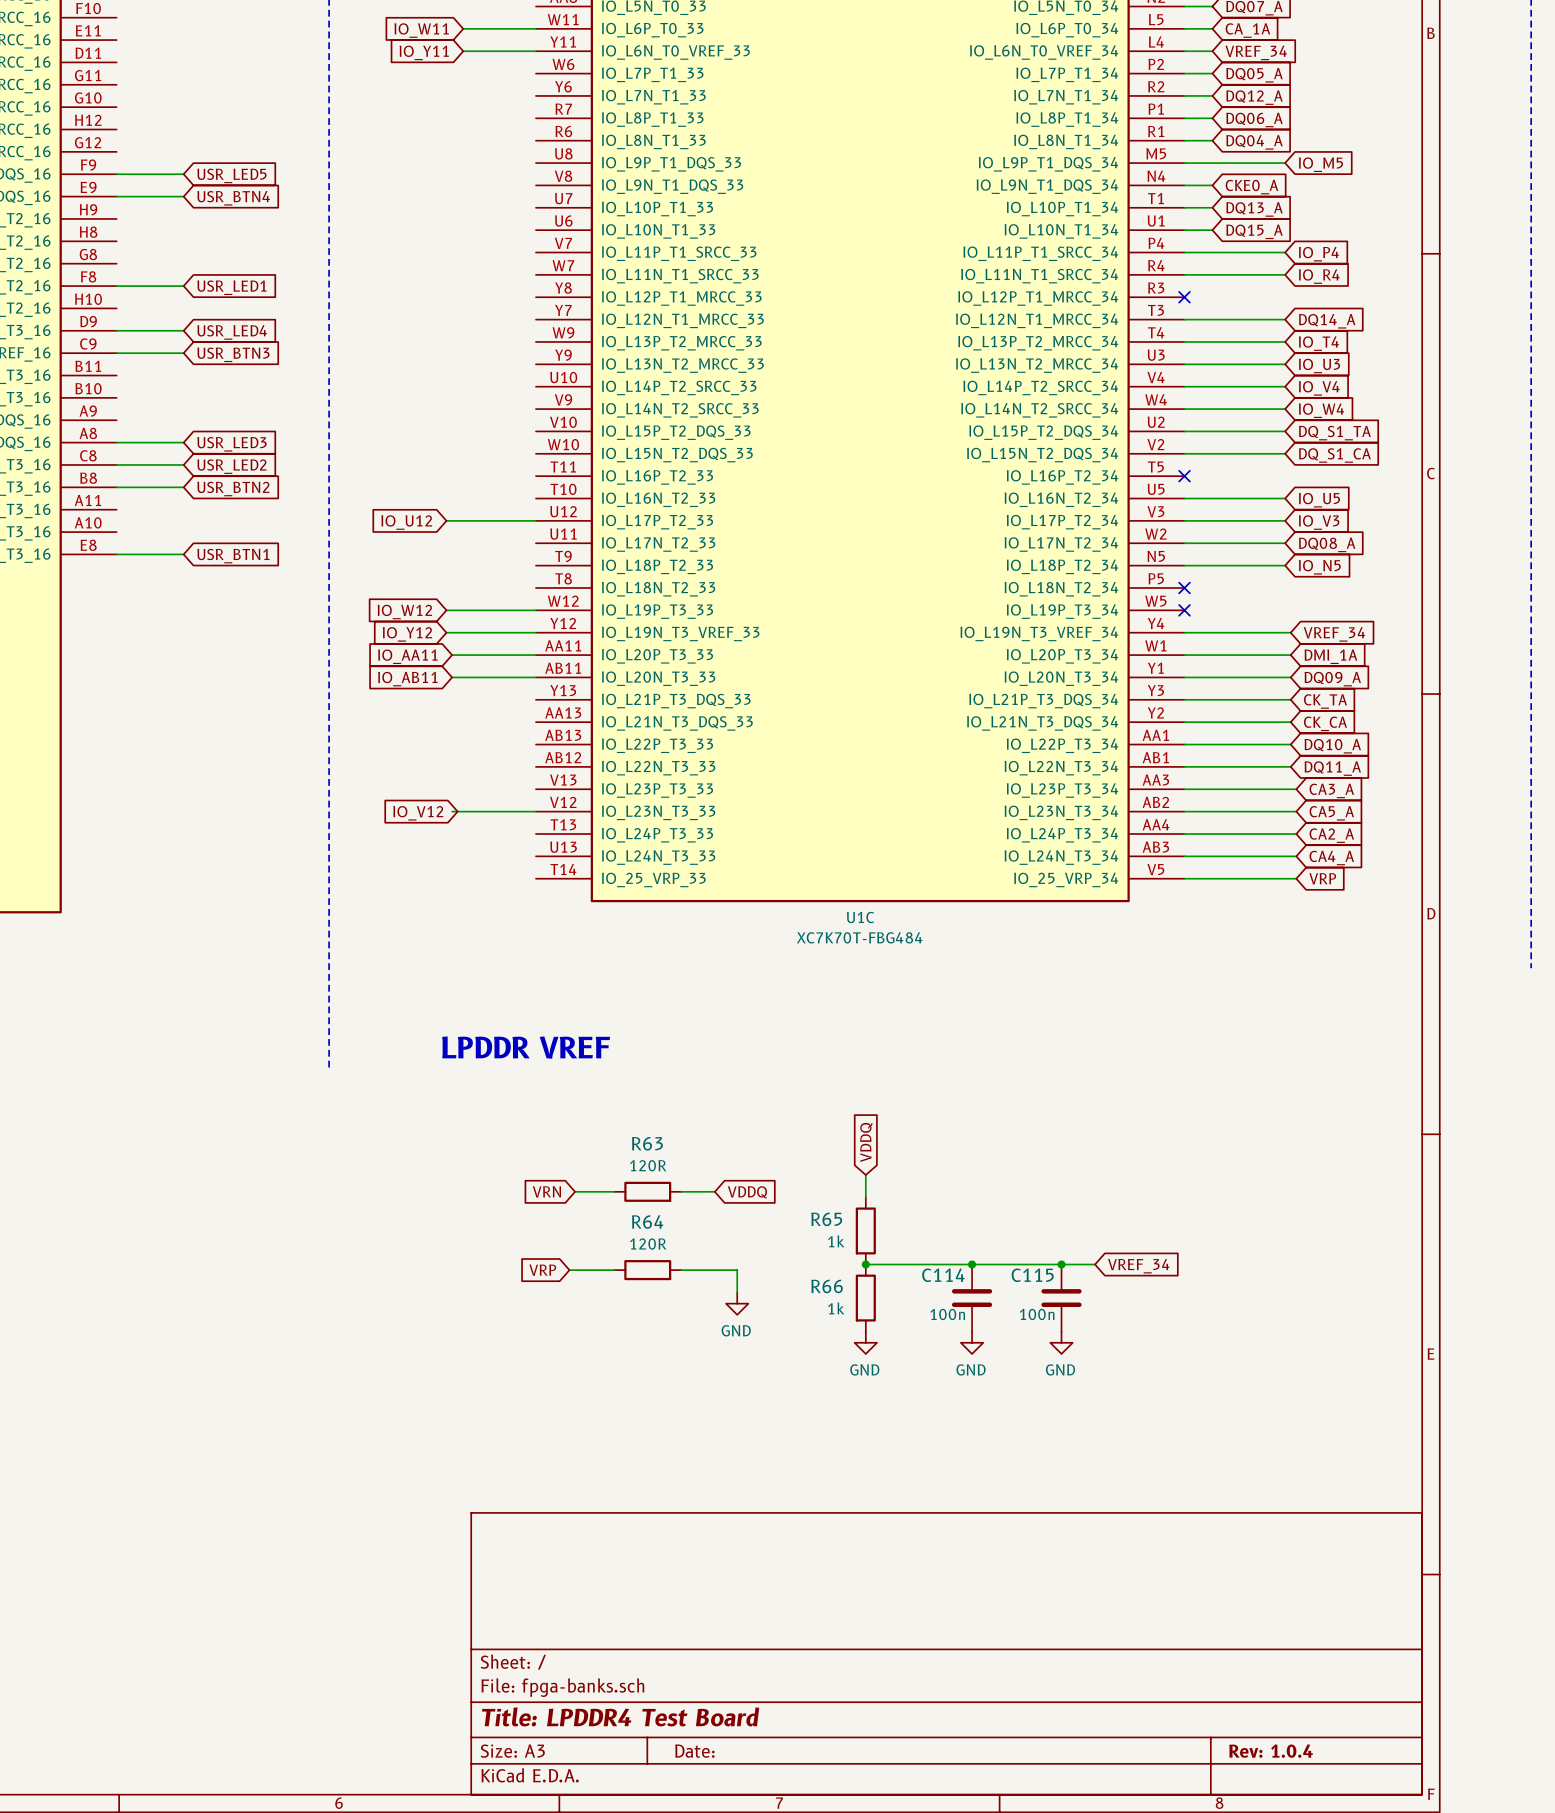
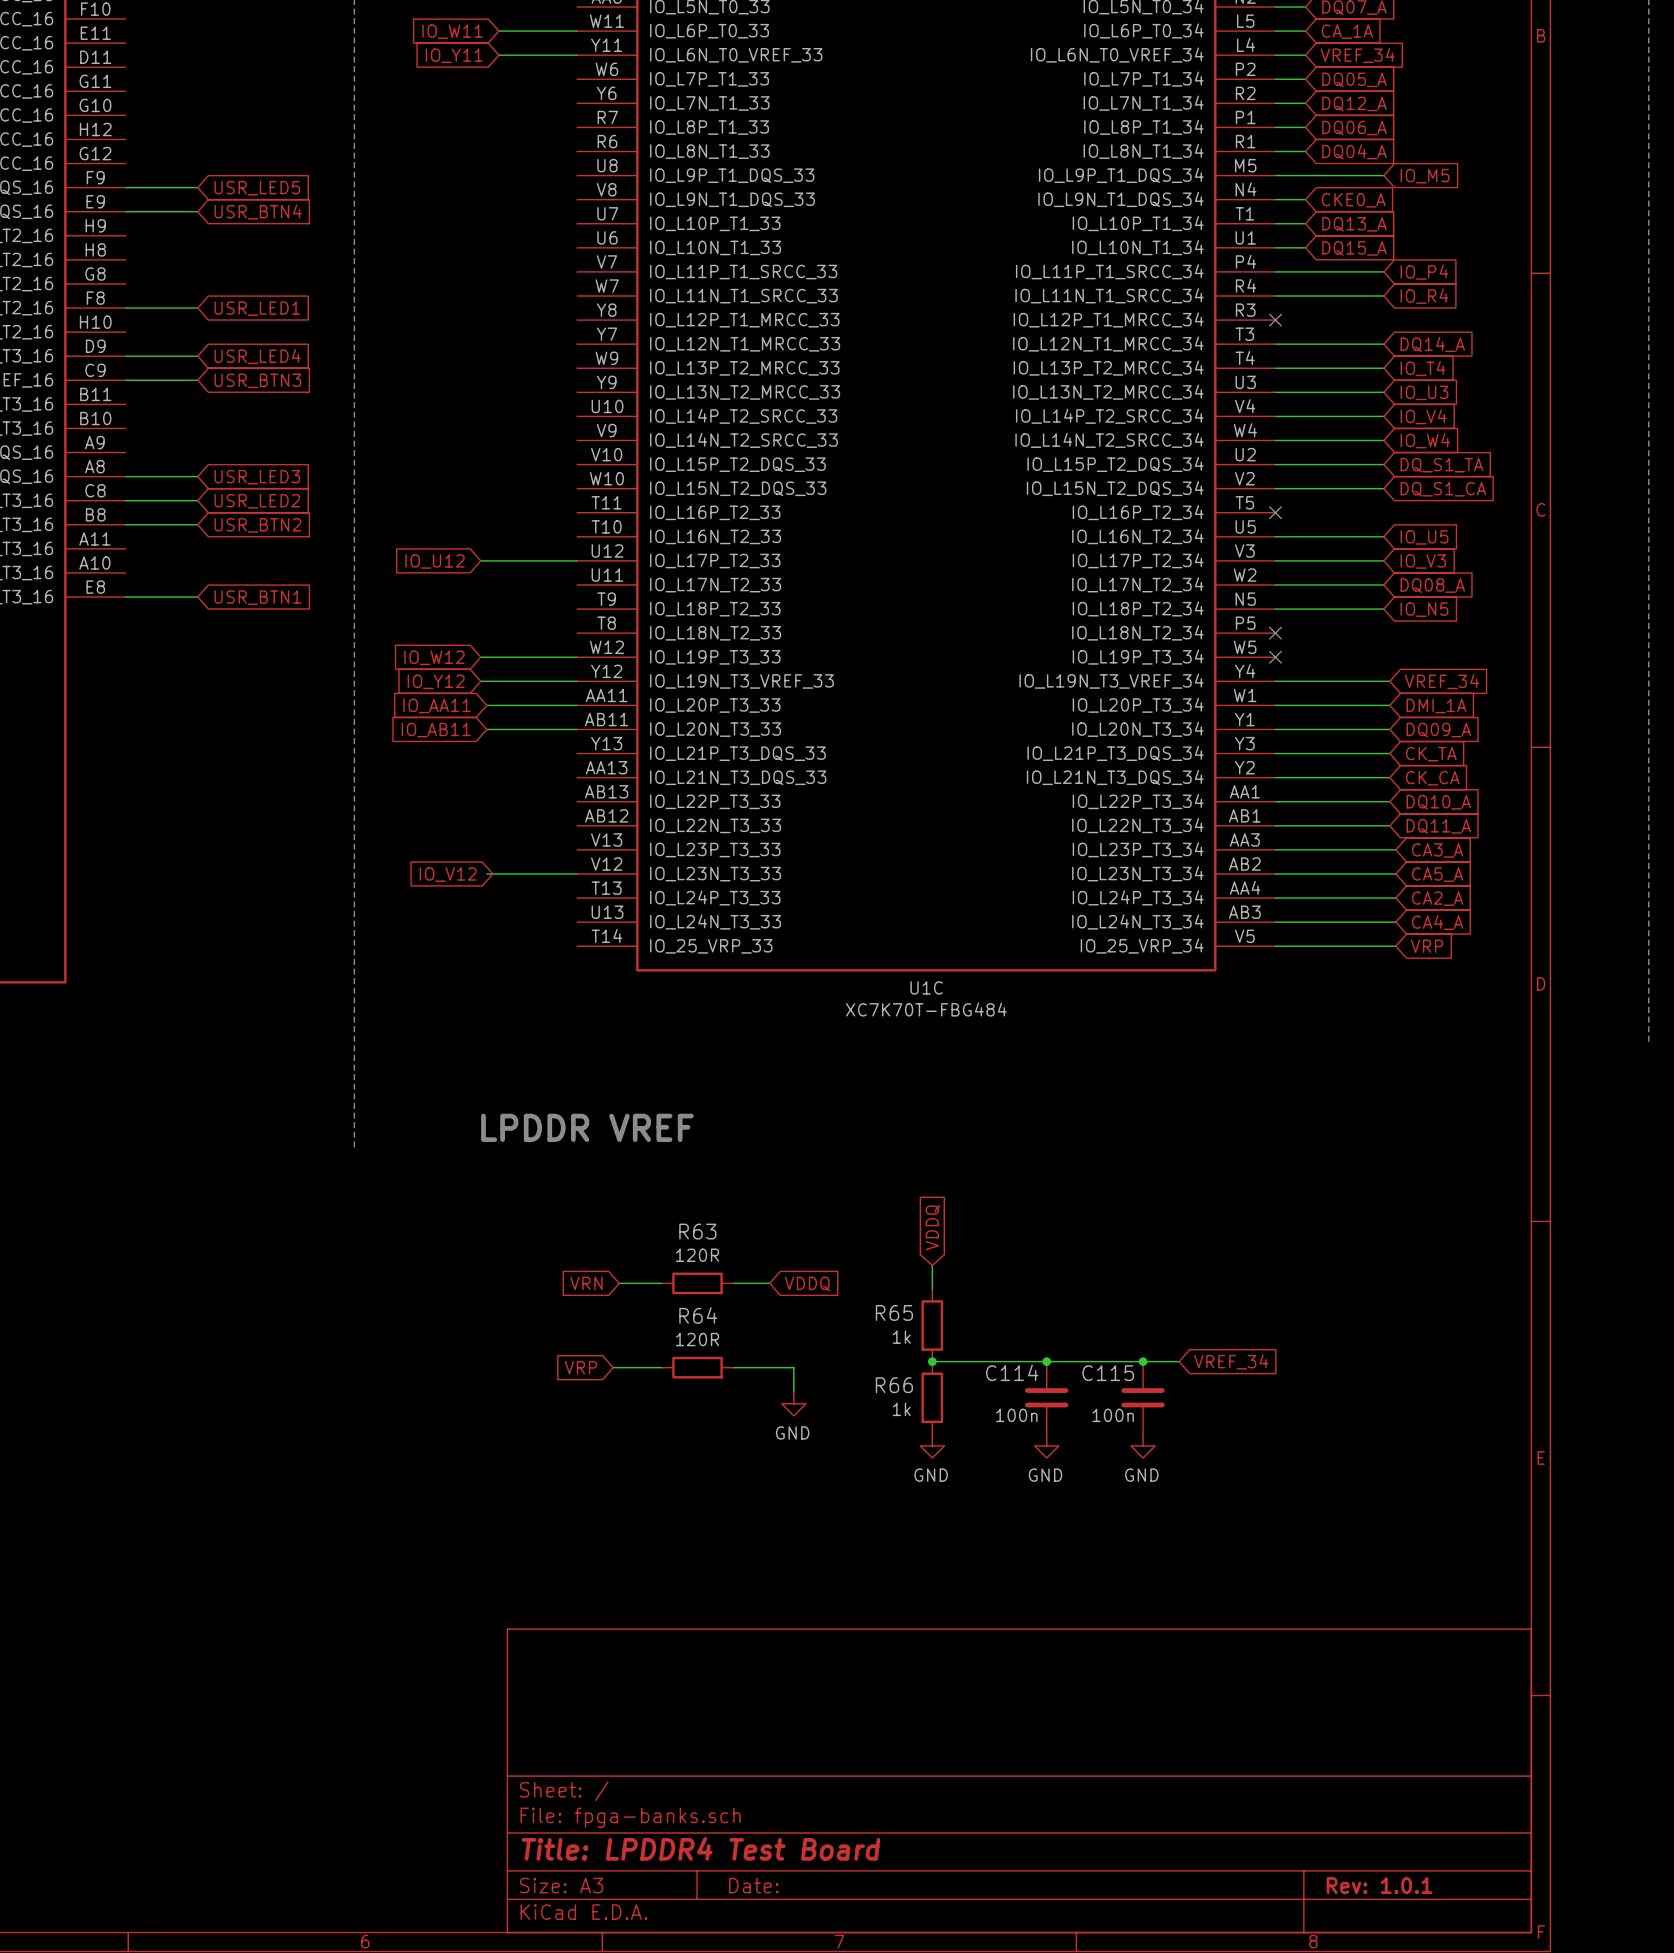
title block: Rev: 1.0.4 (1271, 1751) -> Rev: 1.0.1 (1379, 1885)

